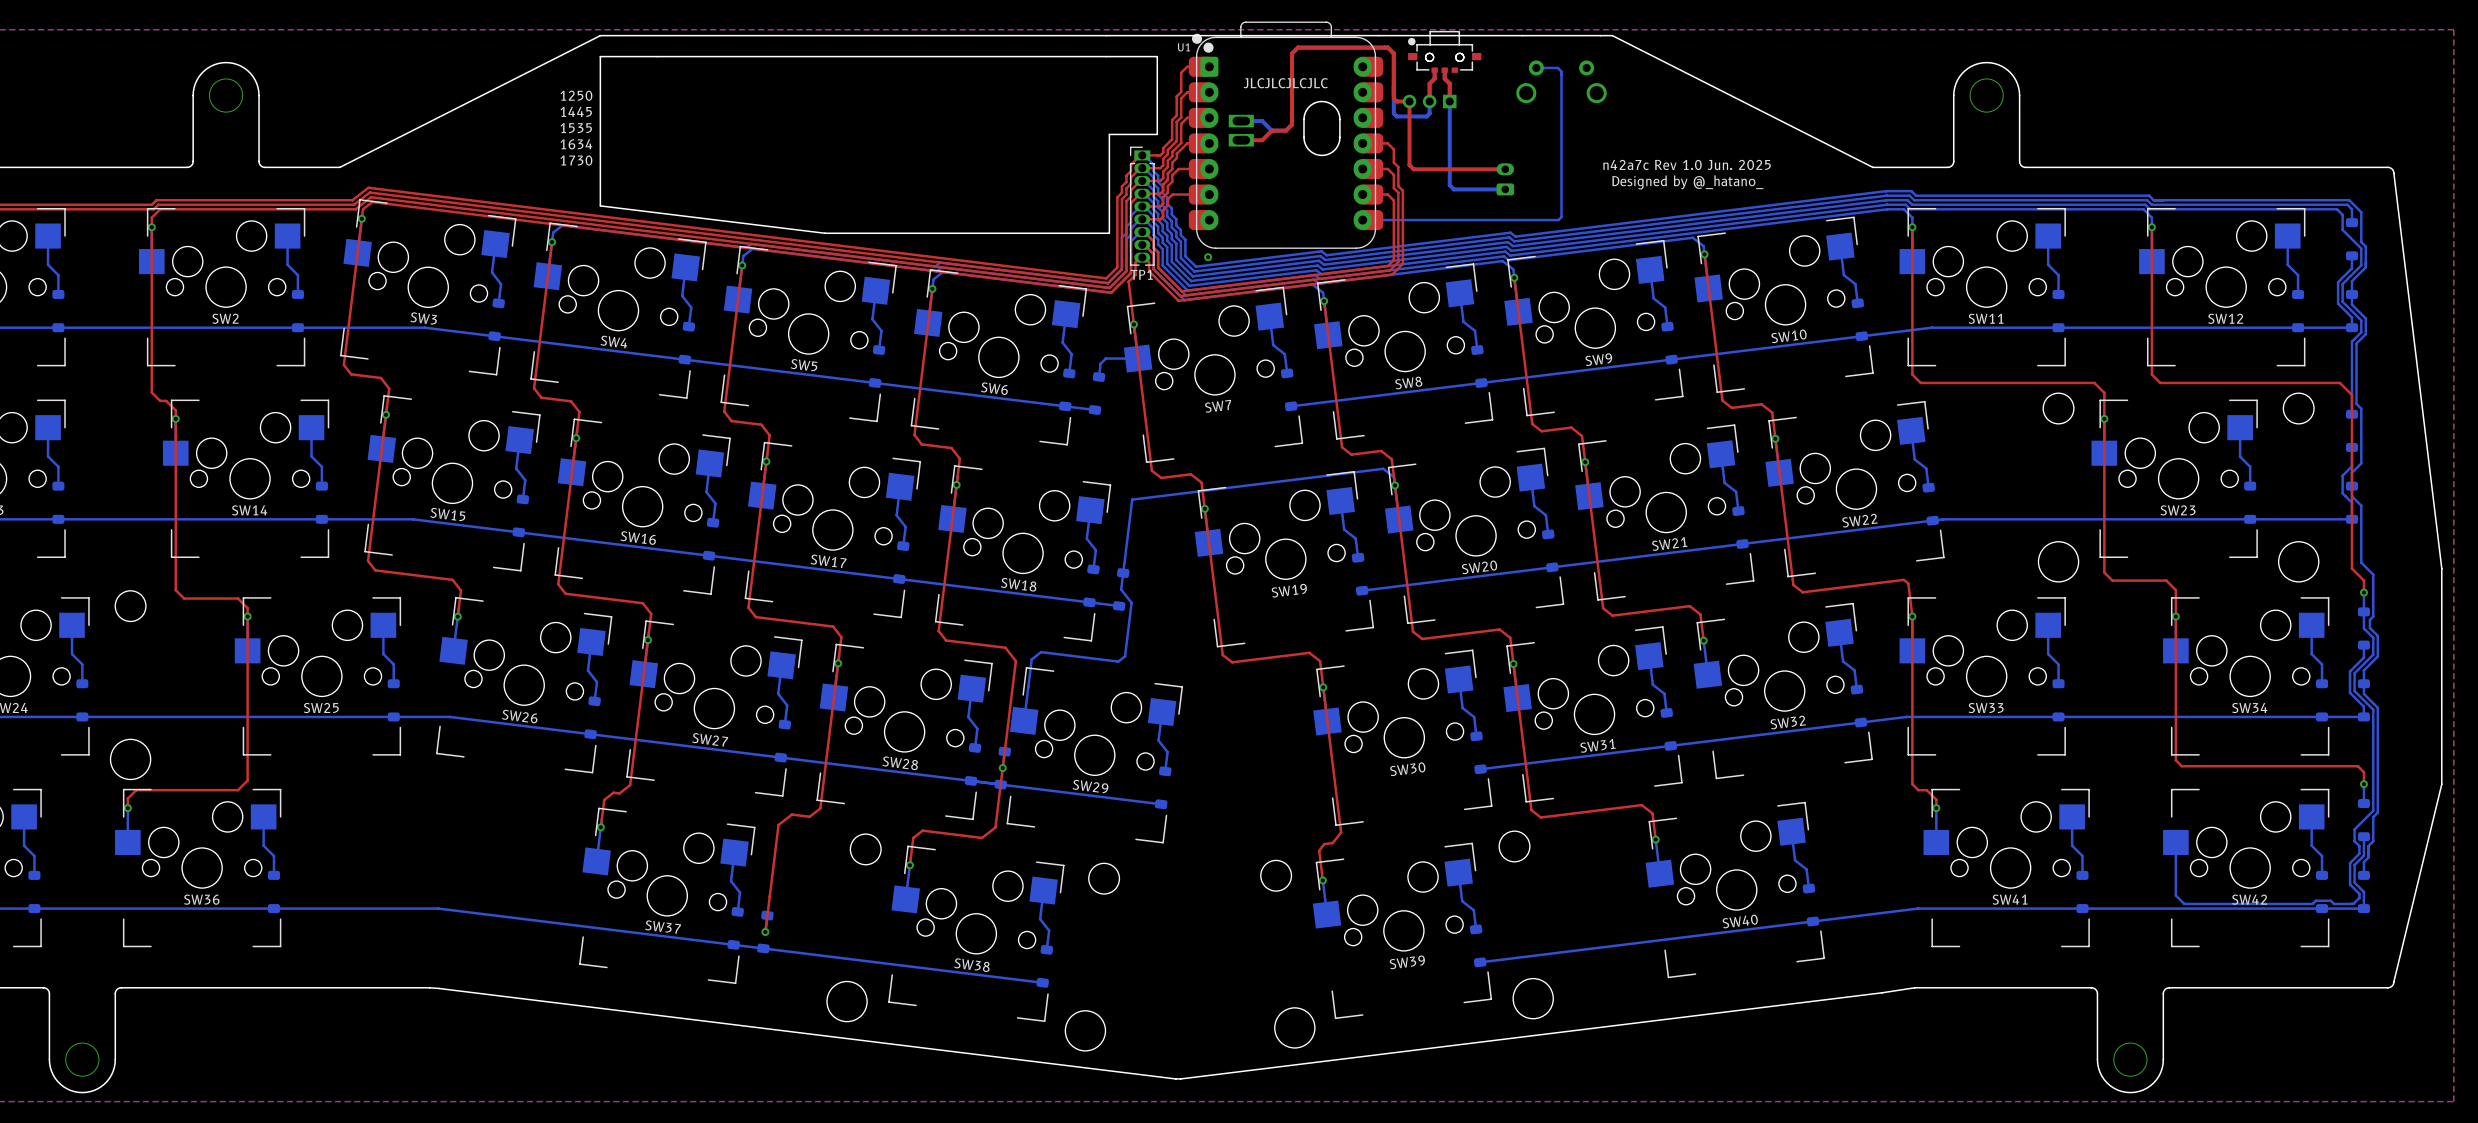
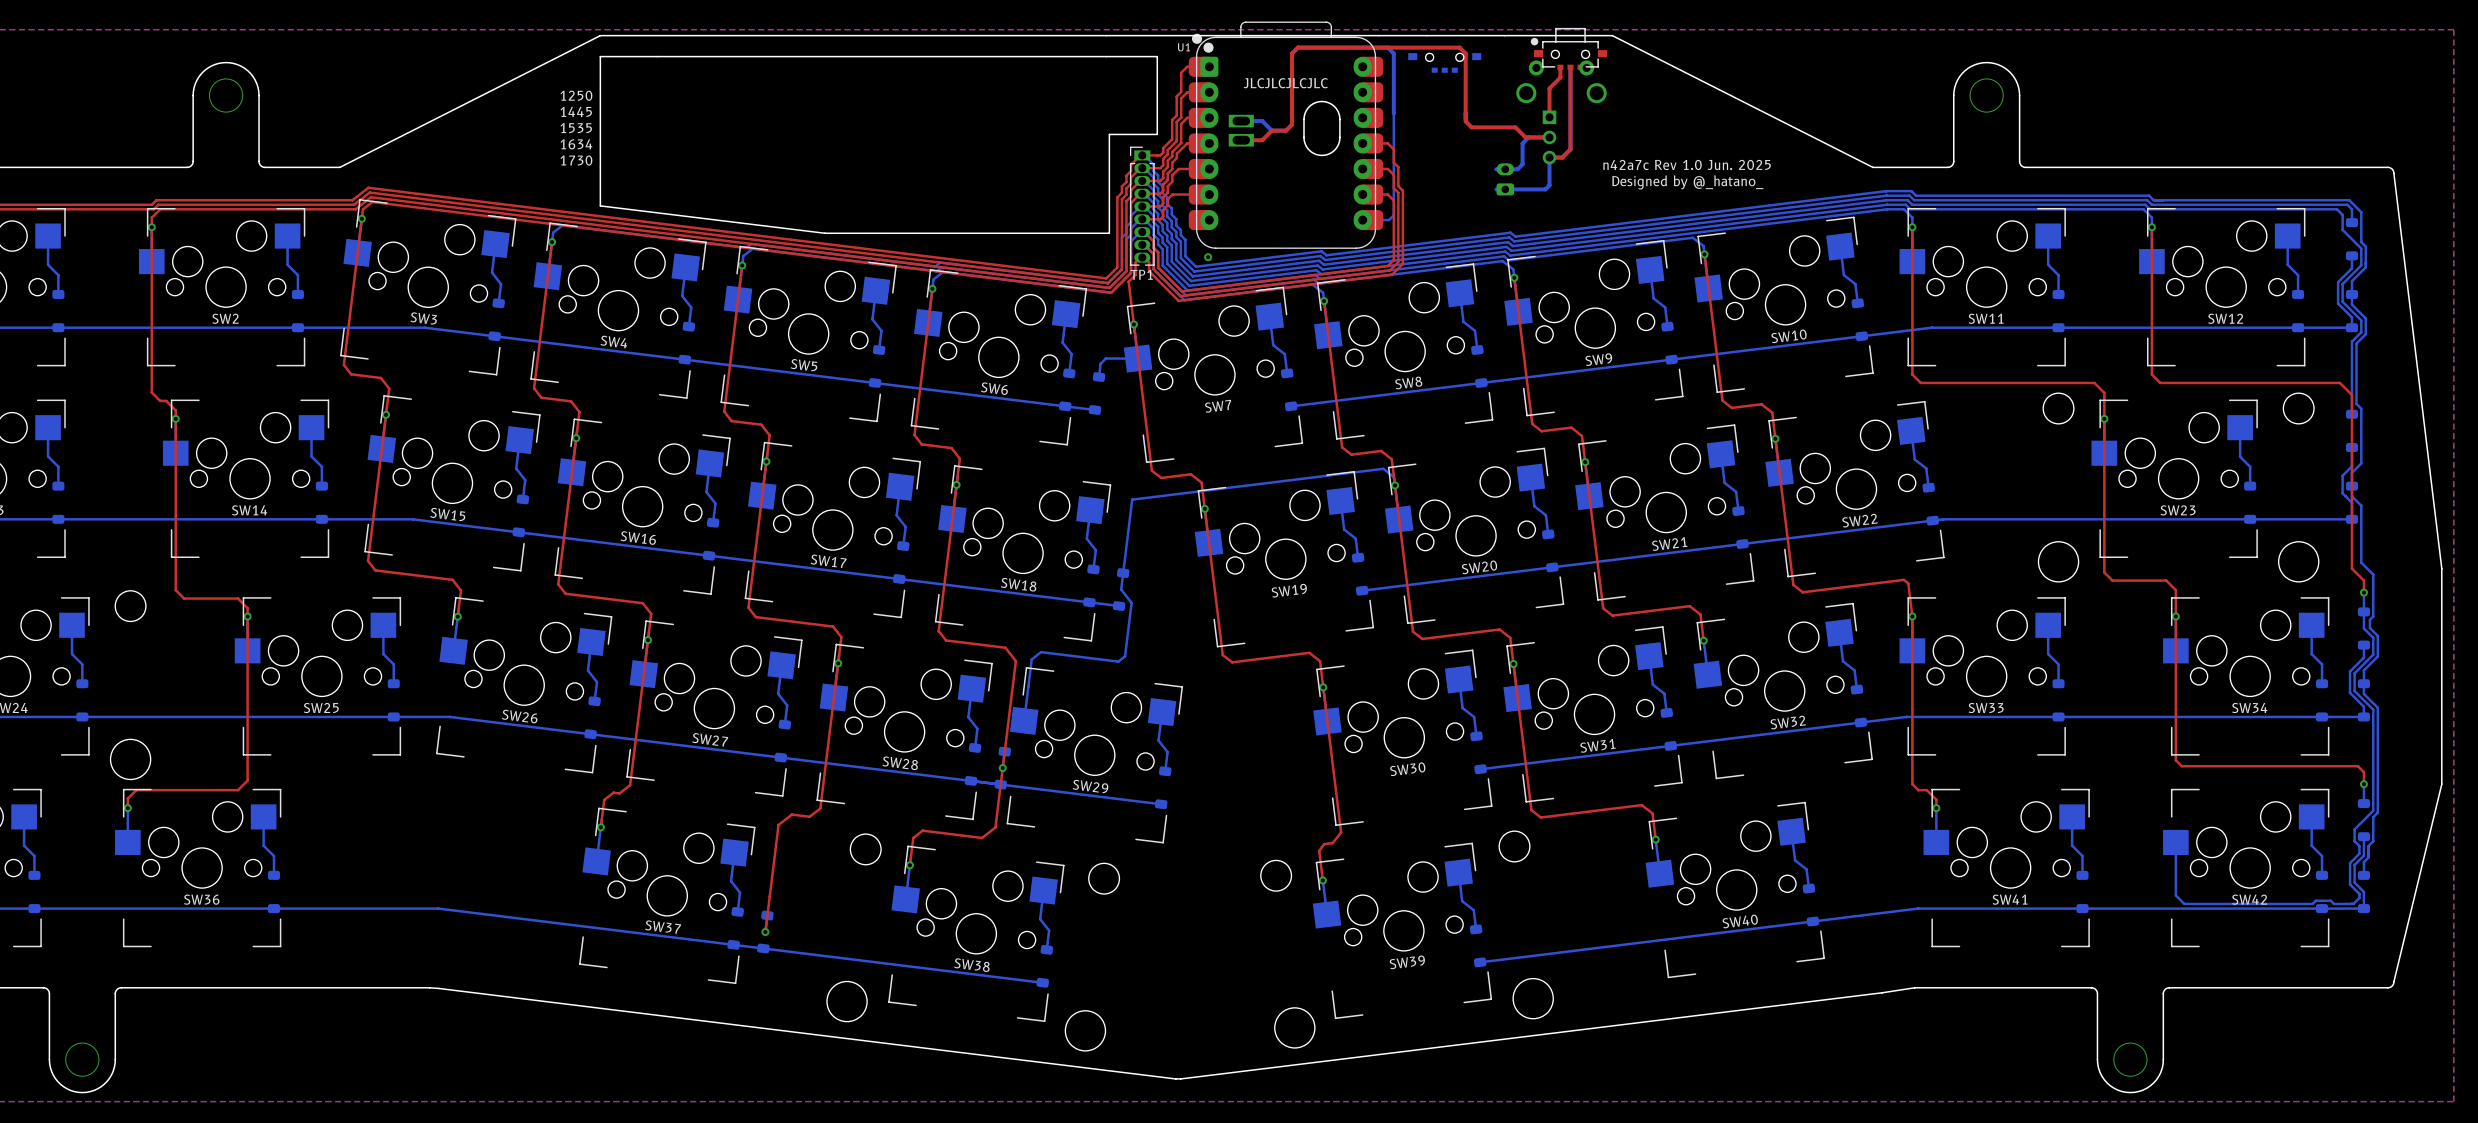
drawing position: (1411, 41) -> (1534, 41)
top track: (1387, 47) (1393, 53) (1393, 98) (1396, 101) (1409, 101) (1409, 165) (1413, 169) (1505, 169) -> (1387, 47) (1459, 47) (1465, 53) (1465, 121) (1471, 127) (1515, 127) (1525, 137) (1549, 137)
part position: (1444, 51) -> (1570, 48)
bottom track: (1536, 67) (1557, 67) (1561, 71) (1561, 217) (1558, 220) (1389, 220) -> (1393, 113) (1393, 215) (1389, 220)
top track: none -> (1560, 67) (1560, 77) (1549, 88) (1549, 112)
bottom track: none -> (1570, 67) (1570, 149) (1562, 157) (1549, 157) (1549, 185) (1545, 189) (1505, 189)
top track: none -> (1570, 67) (1570, 149) (1562, 157) (1549, 157)
bottom track: (1434, 70) (1434, 78) (1429, 83) (1429, 113) (1426, 116) (1396, 116) (1393, 113) -> none
top track: (1434, 70) (1434, 78) (1429, 83) (1429, 101) -> none
bottom track: (1444, 70) (1444, 78) (1449, 83) (1449, 185) (1453, 189) (1496, 189) -> none
top track: (1444, 70) (1444, 78) (1449, 83) (1449, 101) -> none
part rotation: 0° (1429, 101) -> 90° counterclockwise (1549, 137)
part position: (1429, 101) -> (1549, 137)
bottom track: none -> (1549, 137) (1528, 137) (1522, 143) (1522, 164) (1517, 169) (1496, 169)

